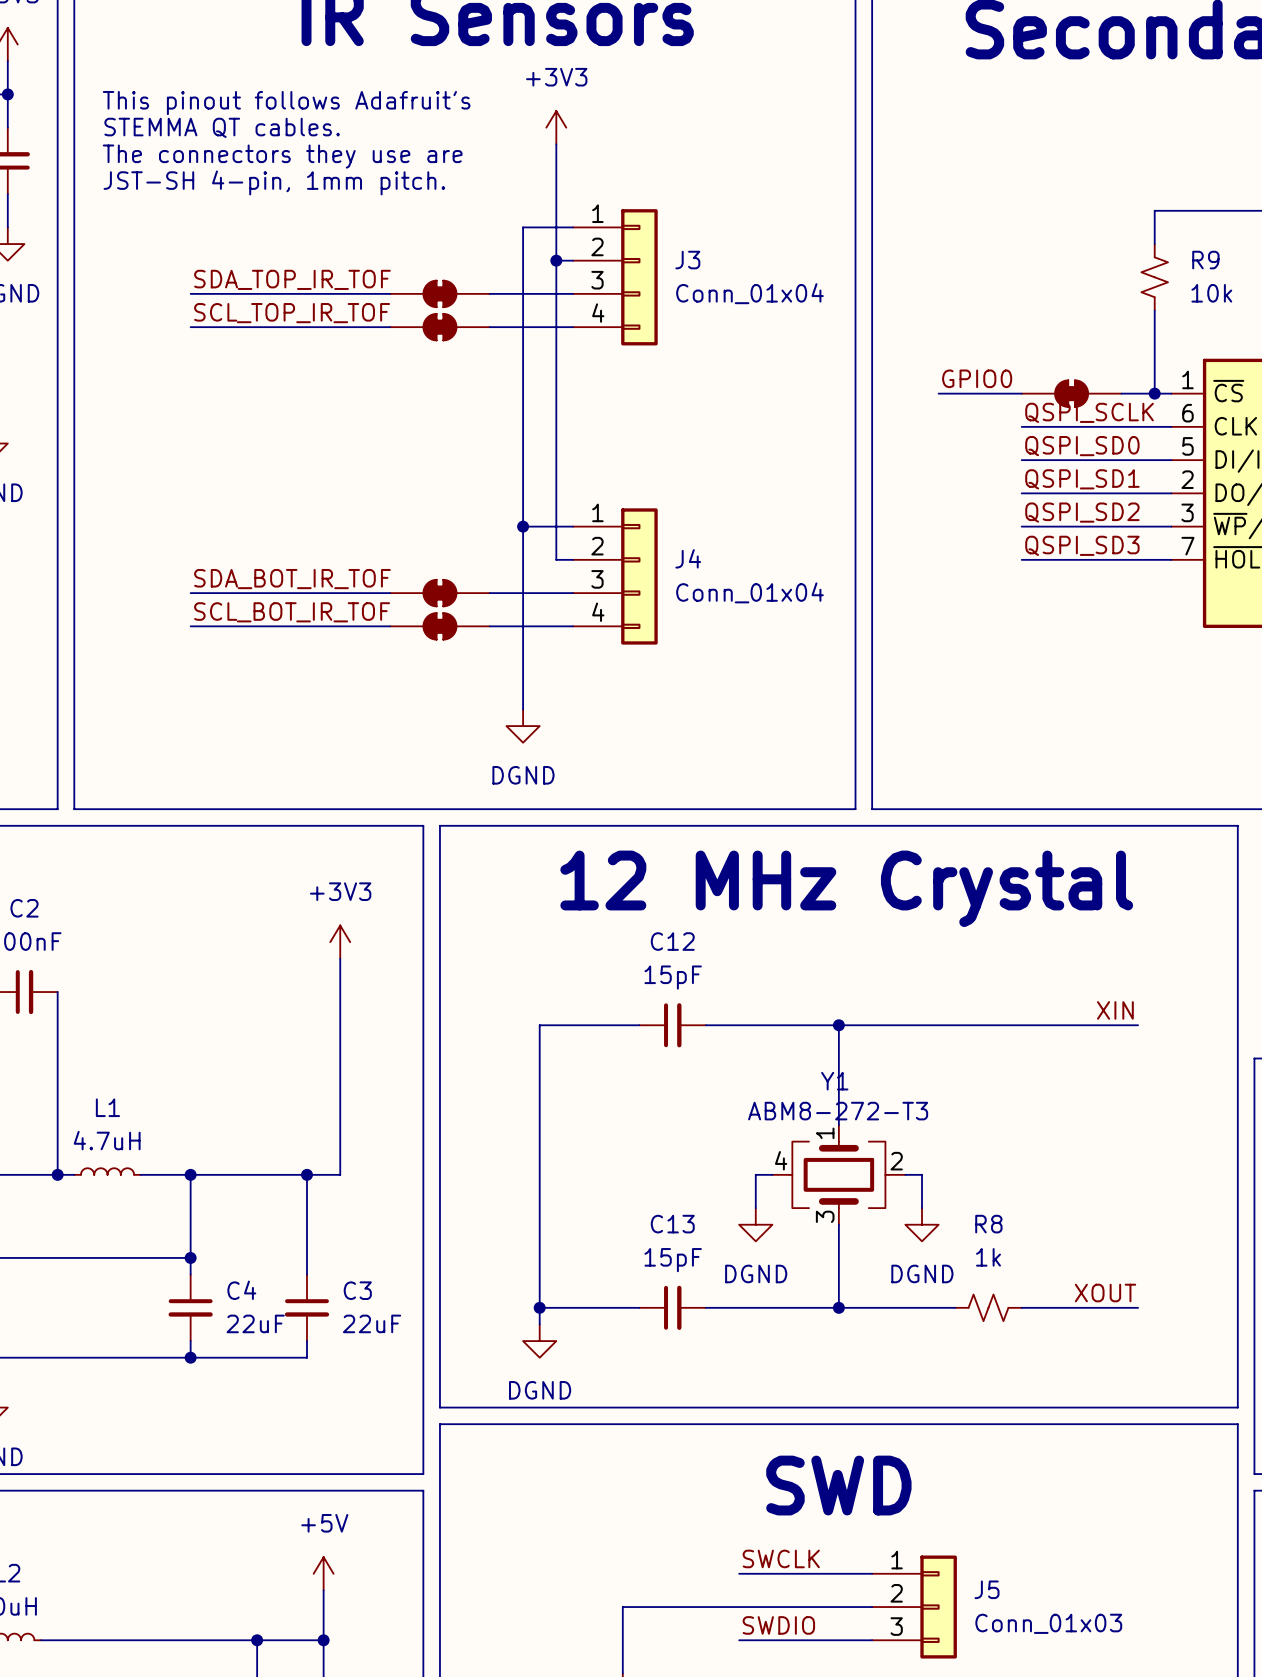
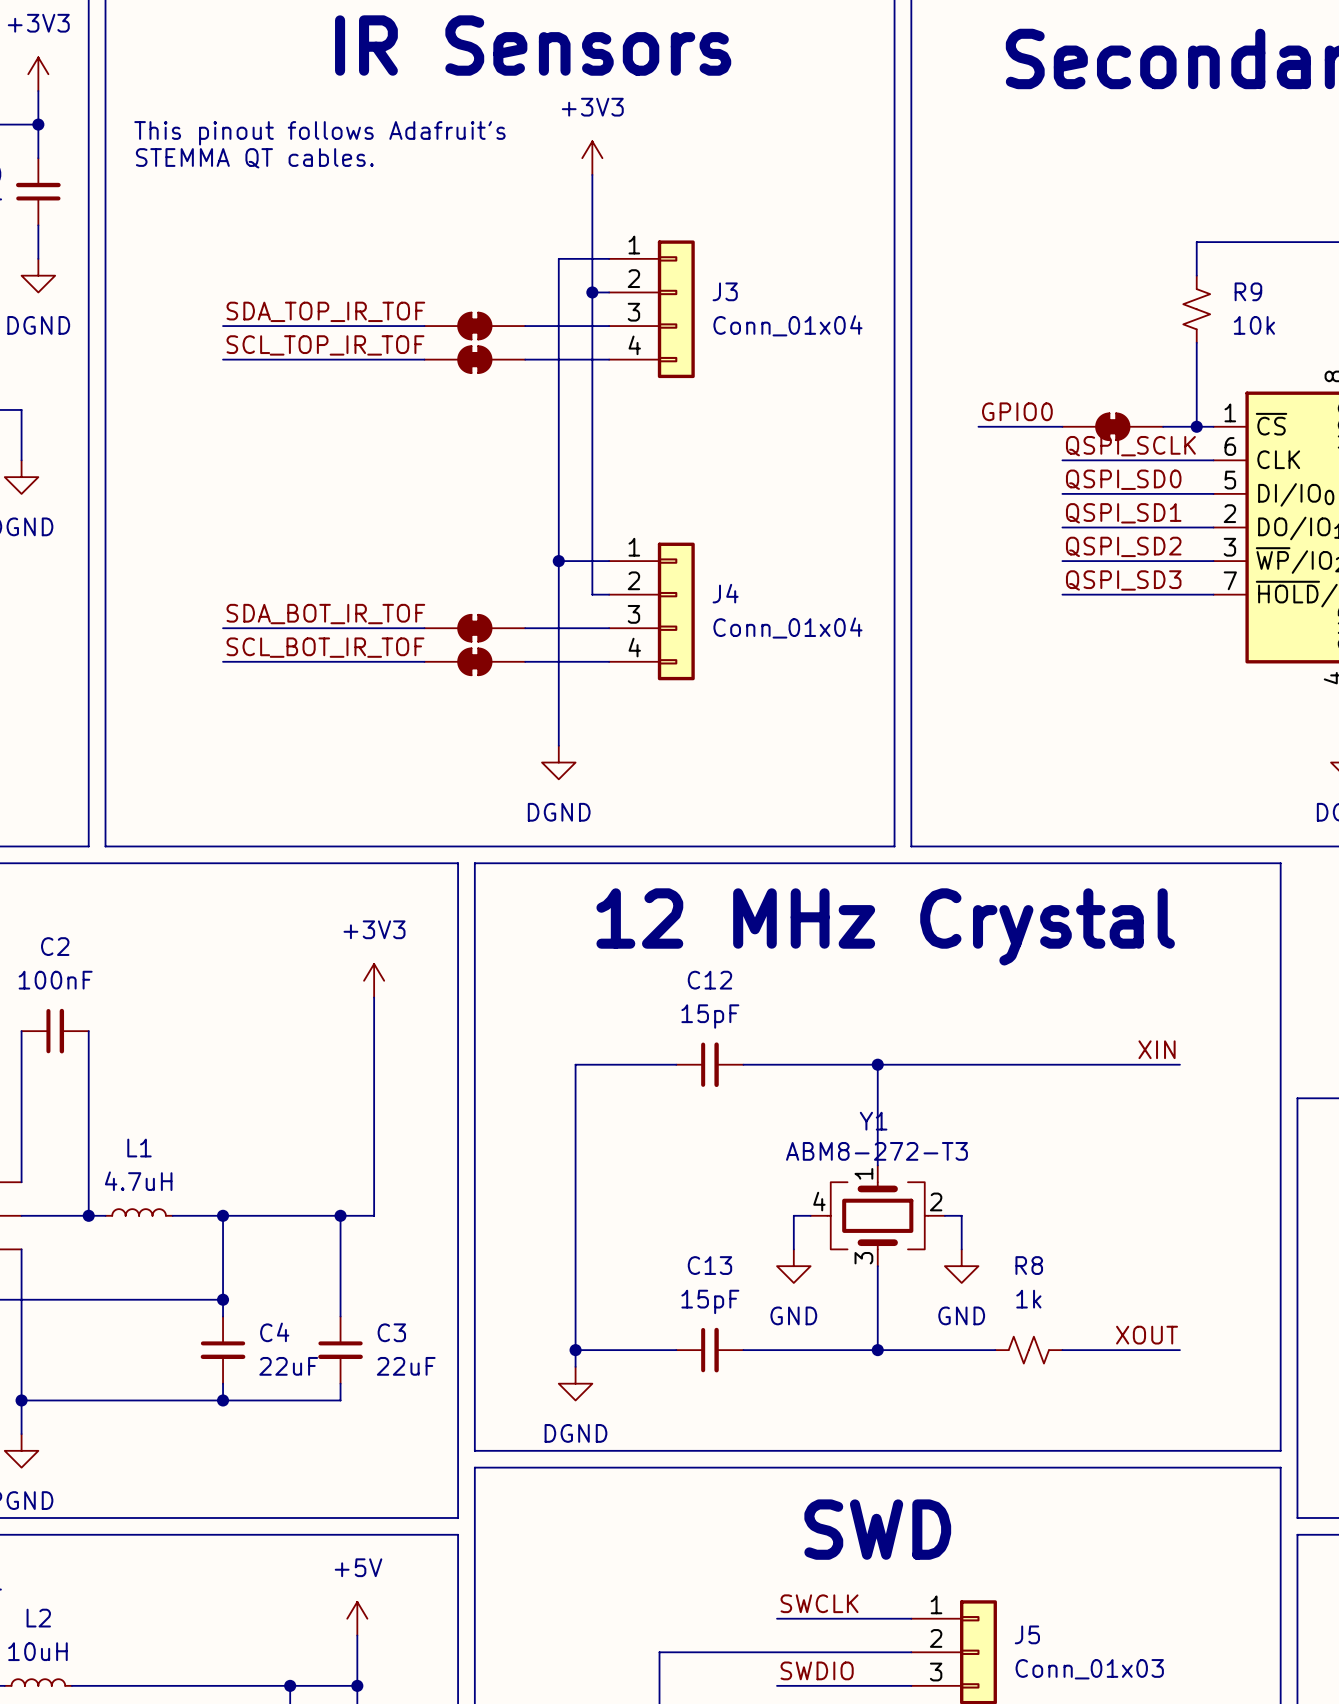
text: The connectors they use are (282, 156) -> none
text: JST-SH 4-pin, 1mm pitch. (274, 182) -> none
power symbol: DGND (755, 1224) -> GND (793, 1266)
power symbol: DGND (922, 1224) -> GND (961, 1266)

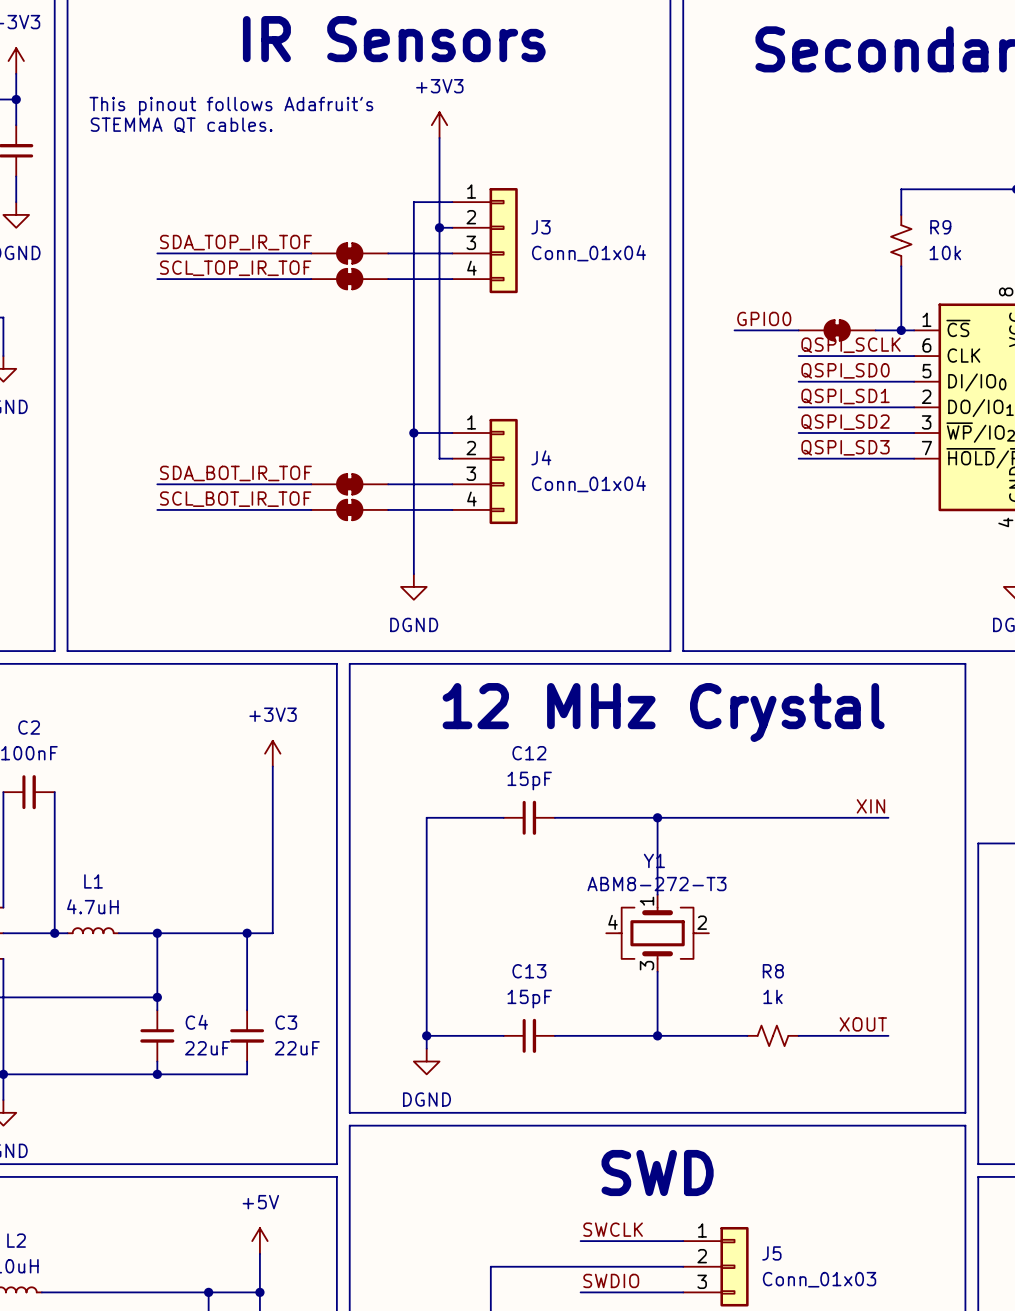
wire: (810, 1215) (793, 1215) (793, 1249) -> none
wire: (944, 1215) (961, 1215) (961, 1249) -> none
power symbol: GND (793, 1266) -> none
power symbol: GND (961, 1266) -> none

